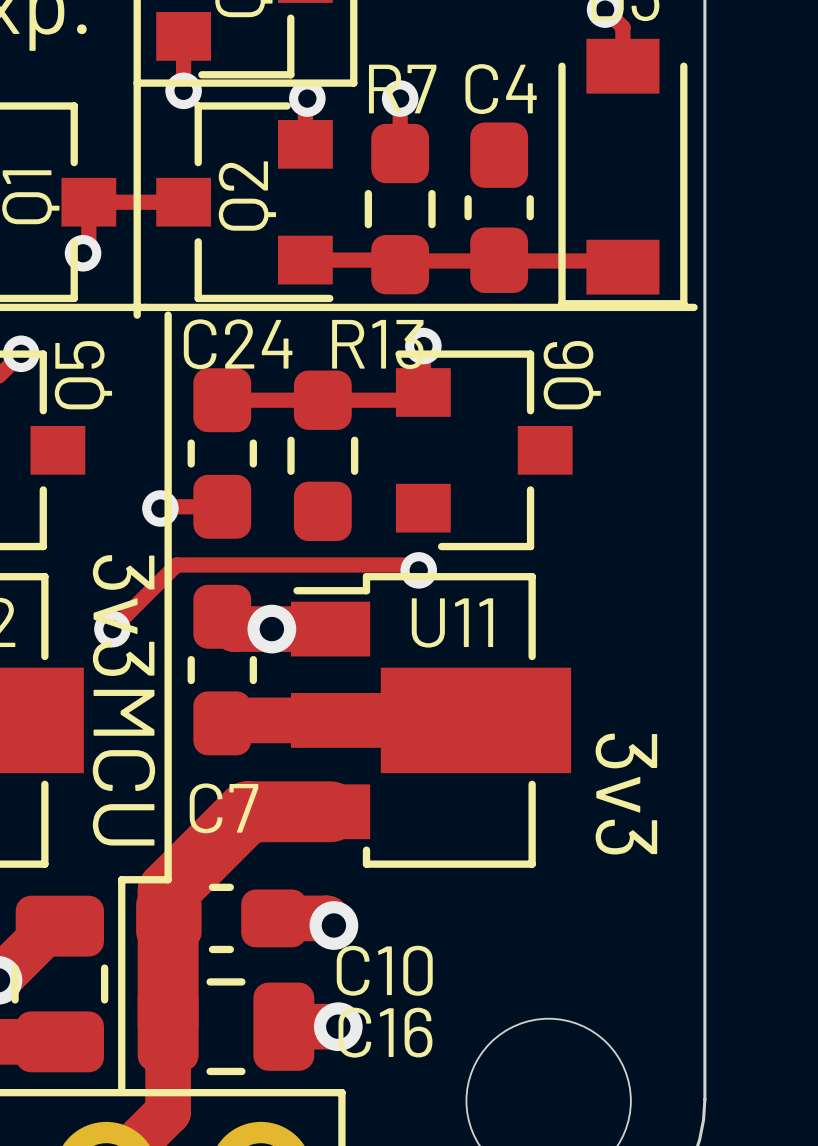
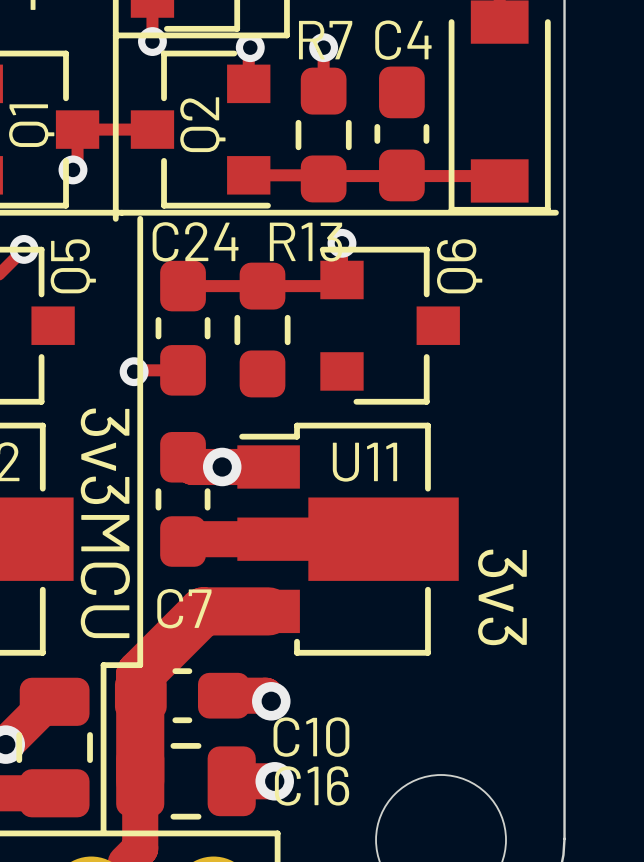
track: (418, 570) (413, 565) (176, 565) (112, 629) -> none
via: (418, 570) -> none
via: (112, 629) -> none

